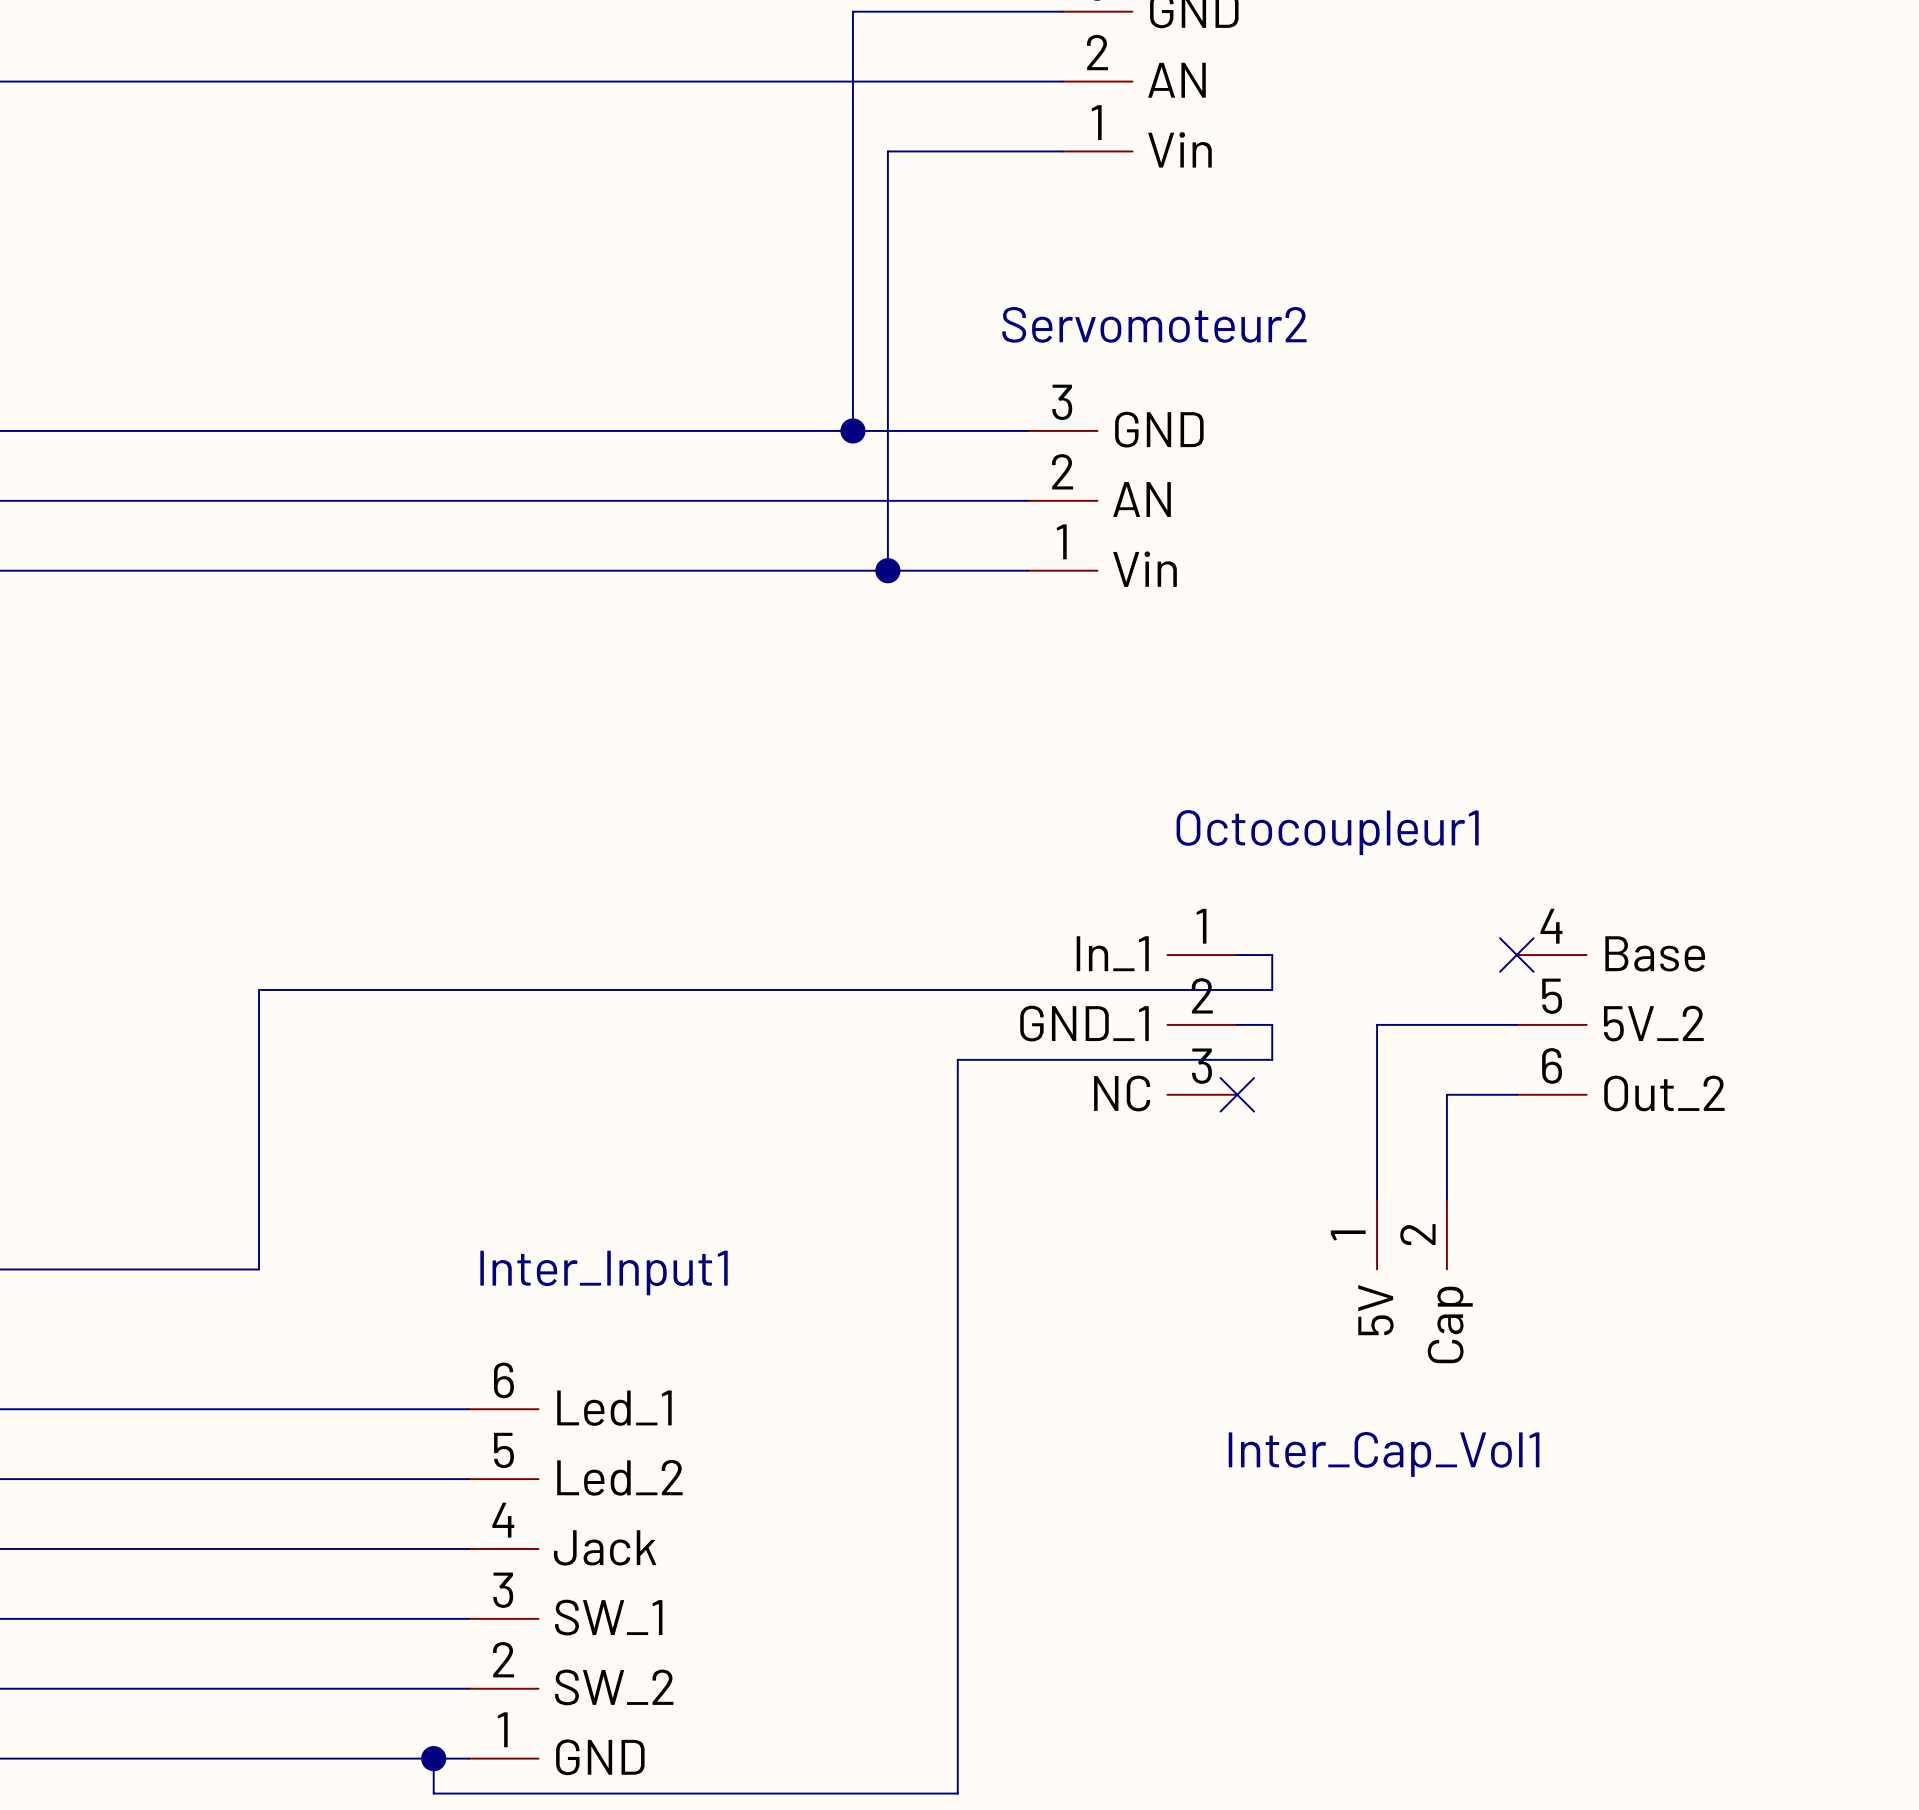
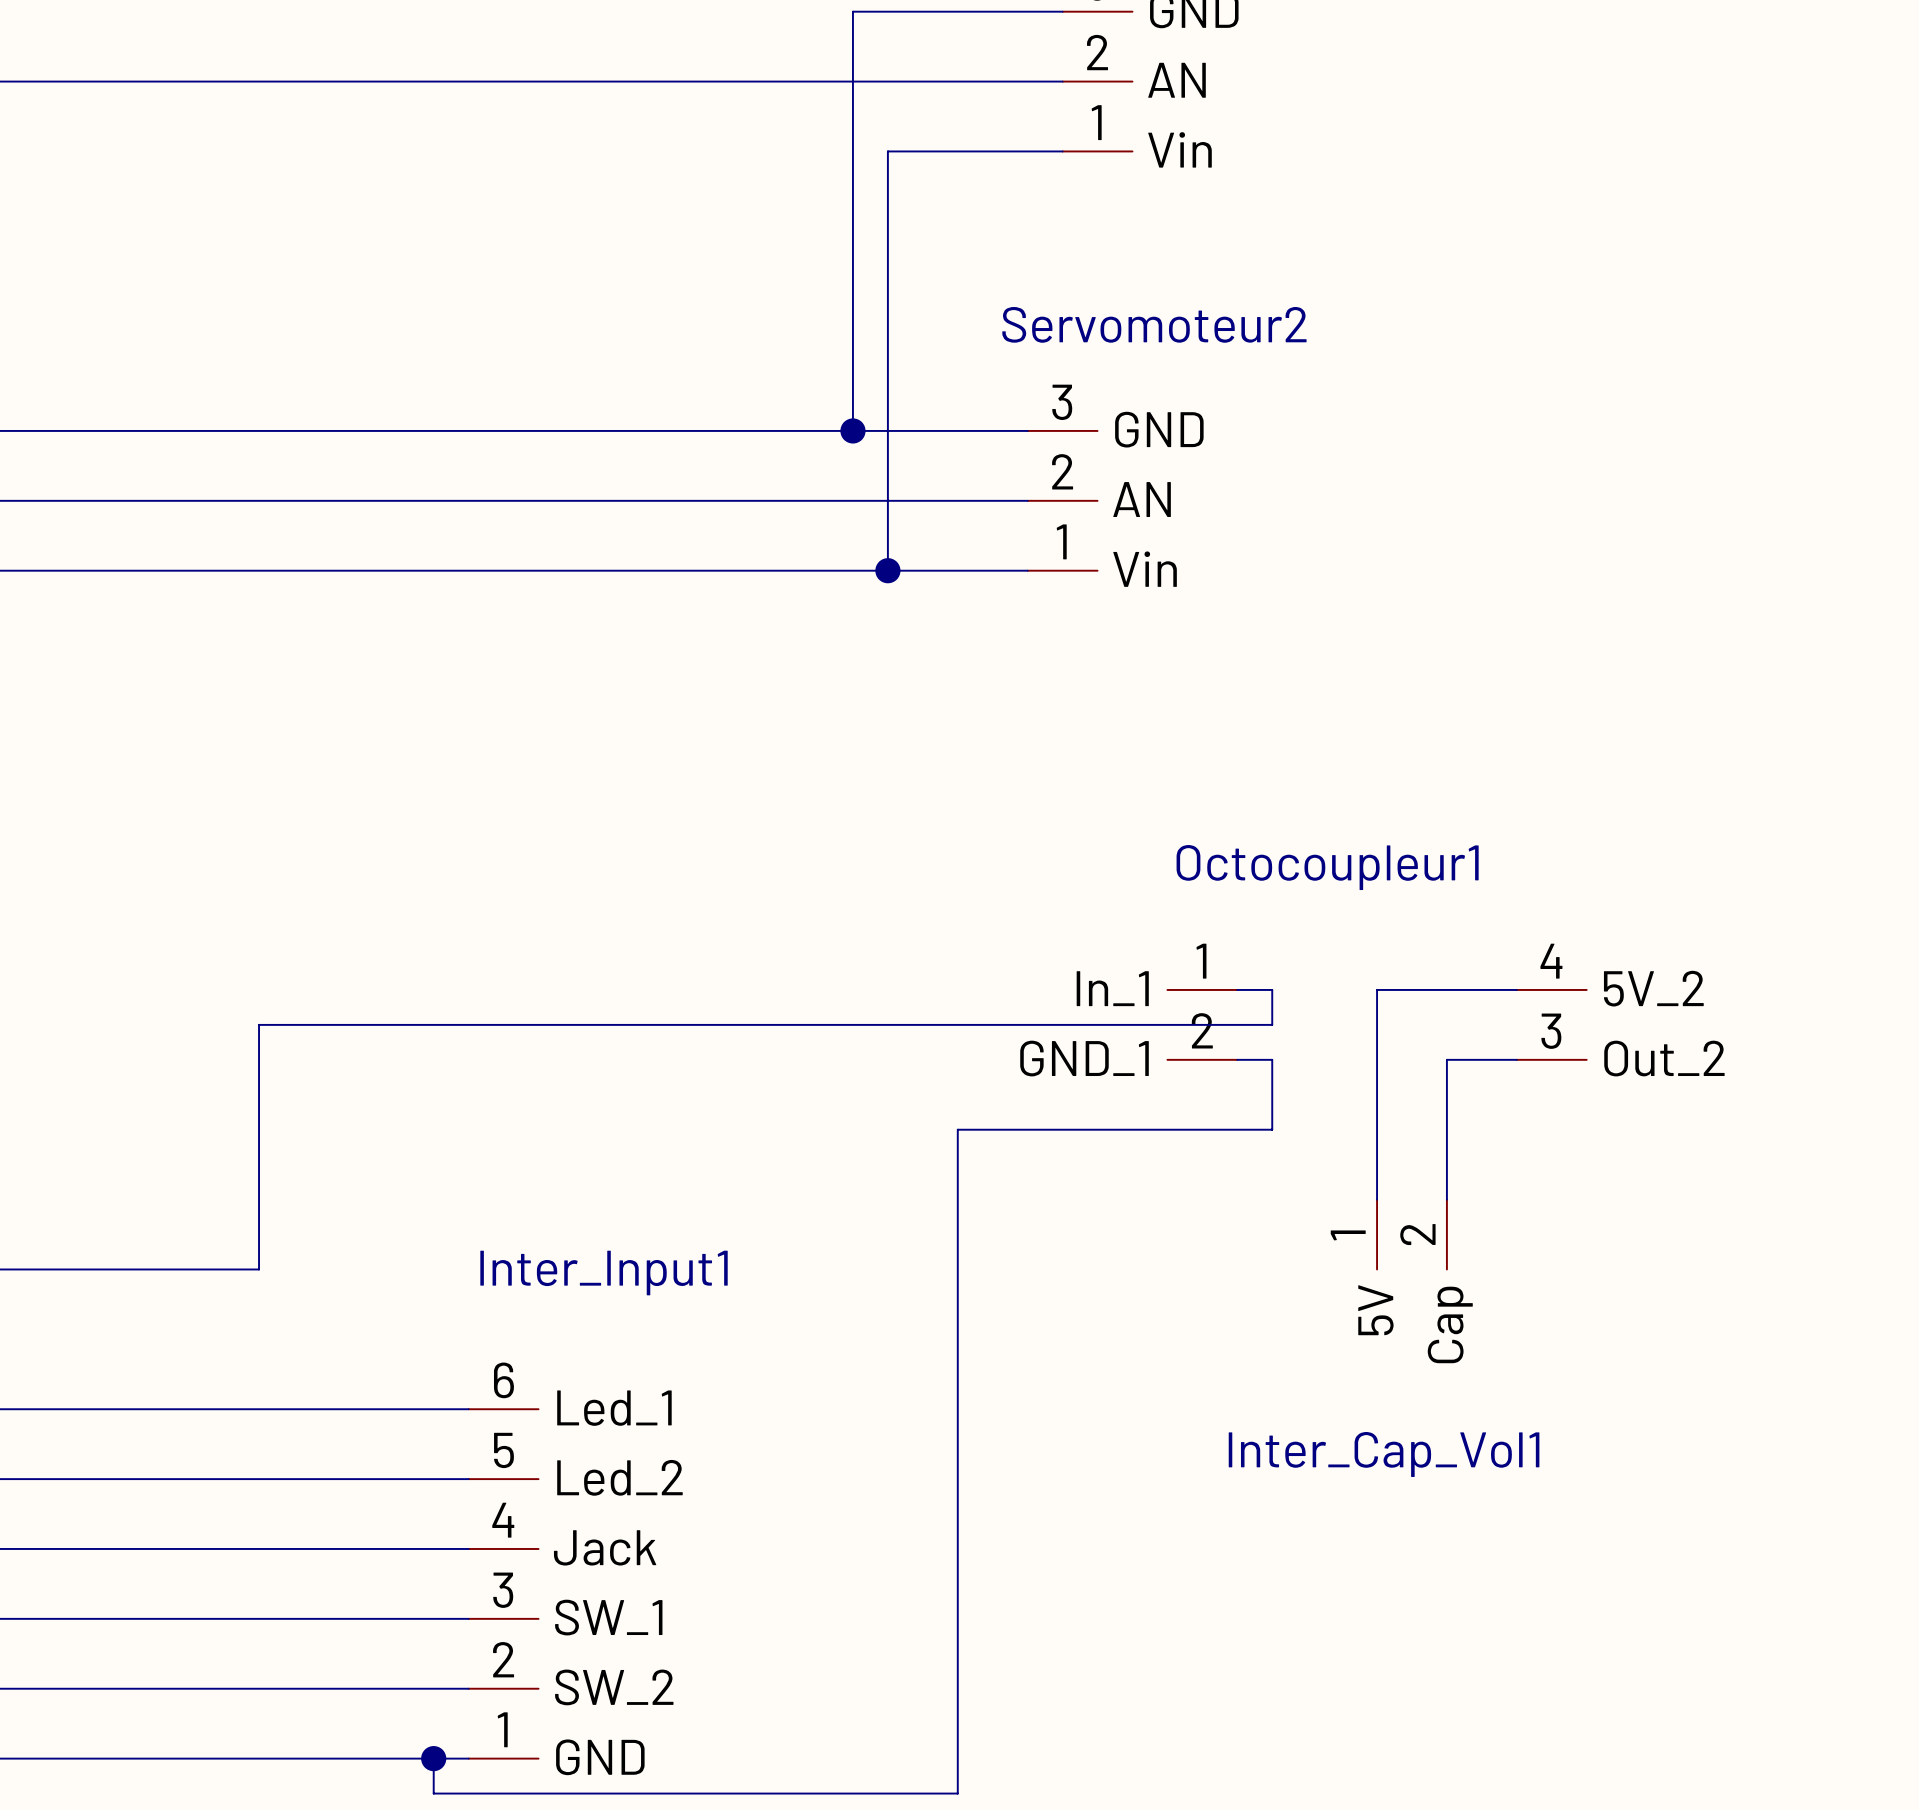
Octocoupleur1 symbol: [1167, 955, 1587, 1095] -> [1167, 989, 1587, 1060]
wire: (1237, 955) (1272, 955) (1272, 989) -> none
no-connect mark: (1516, 955) -> none
wire: (1237, 989) (259, 989) (259, 1024) -> (1237, 1024) (259, 1024)
wire: (1272, 1024) (1272, 1059) -> (1272, 1024) (1272, 989)
wire: (1377, 1024) (1516, 1024) -> (1377, 1024) (1377, 989) (1516, 989)
wire: (1237, 1059) (957, 1059) (957, 1129) -> (1272, 1059) (1272, 1129) (957, 1129)
no-connect mark: (1237, 1094) -> none
wire: (1446, 1094) (1516, 1094) -> (1446, 1094) (1446, 1059) (1516, 1059)

